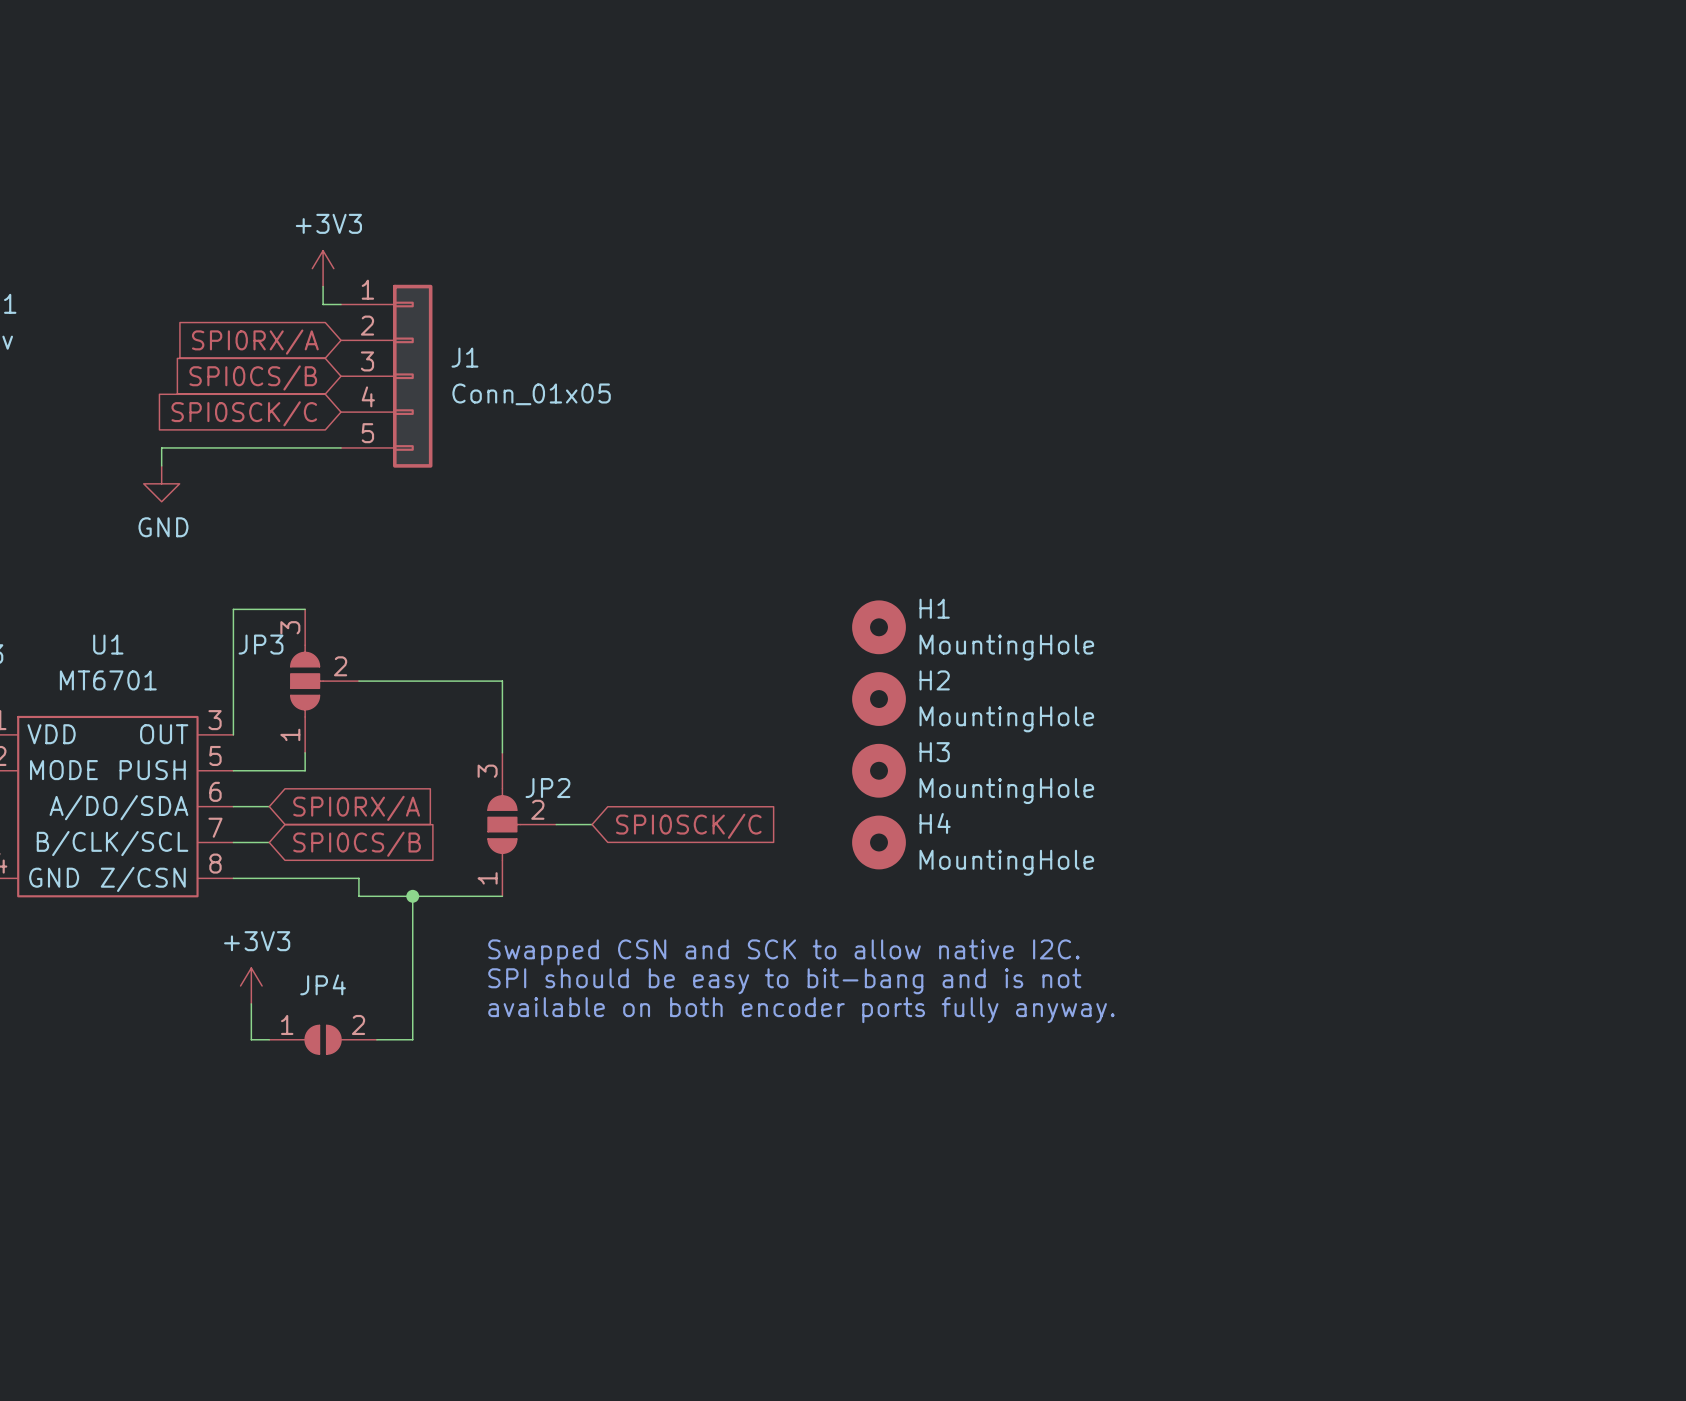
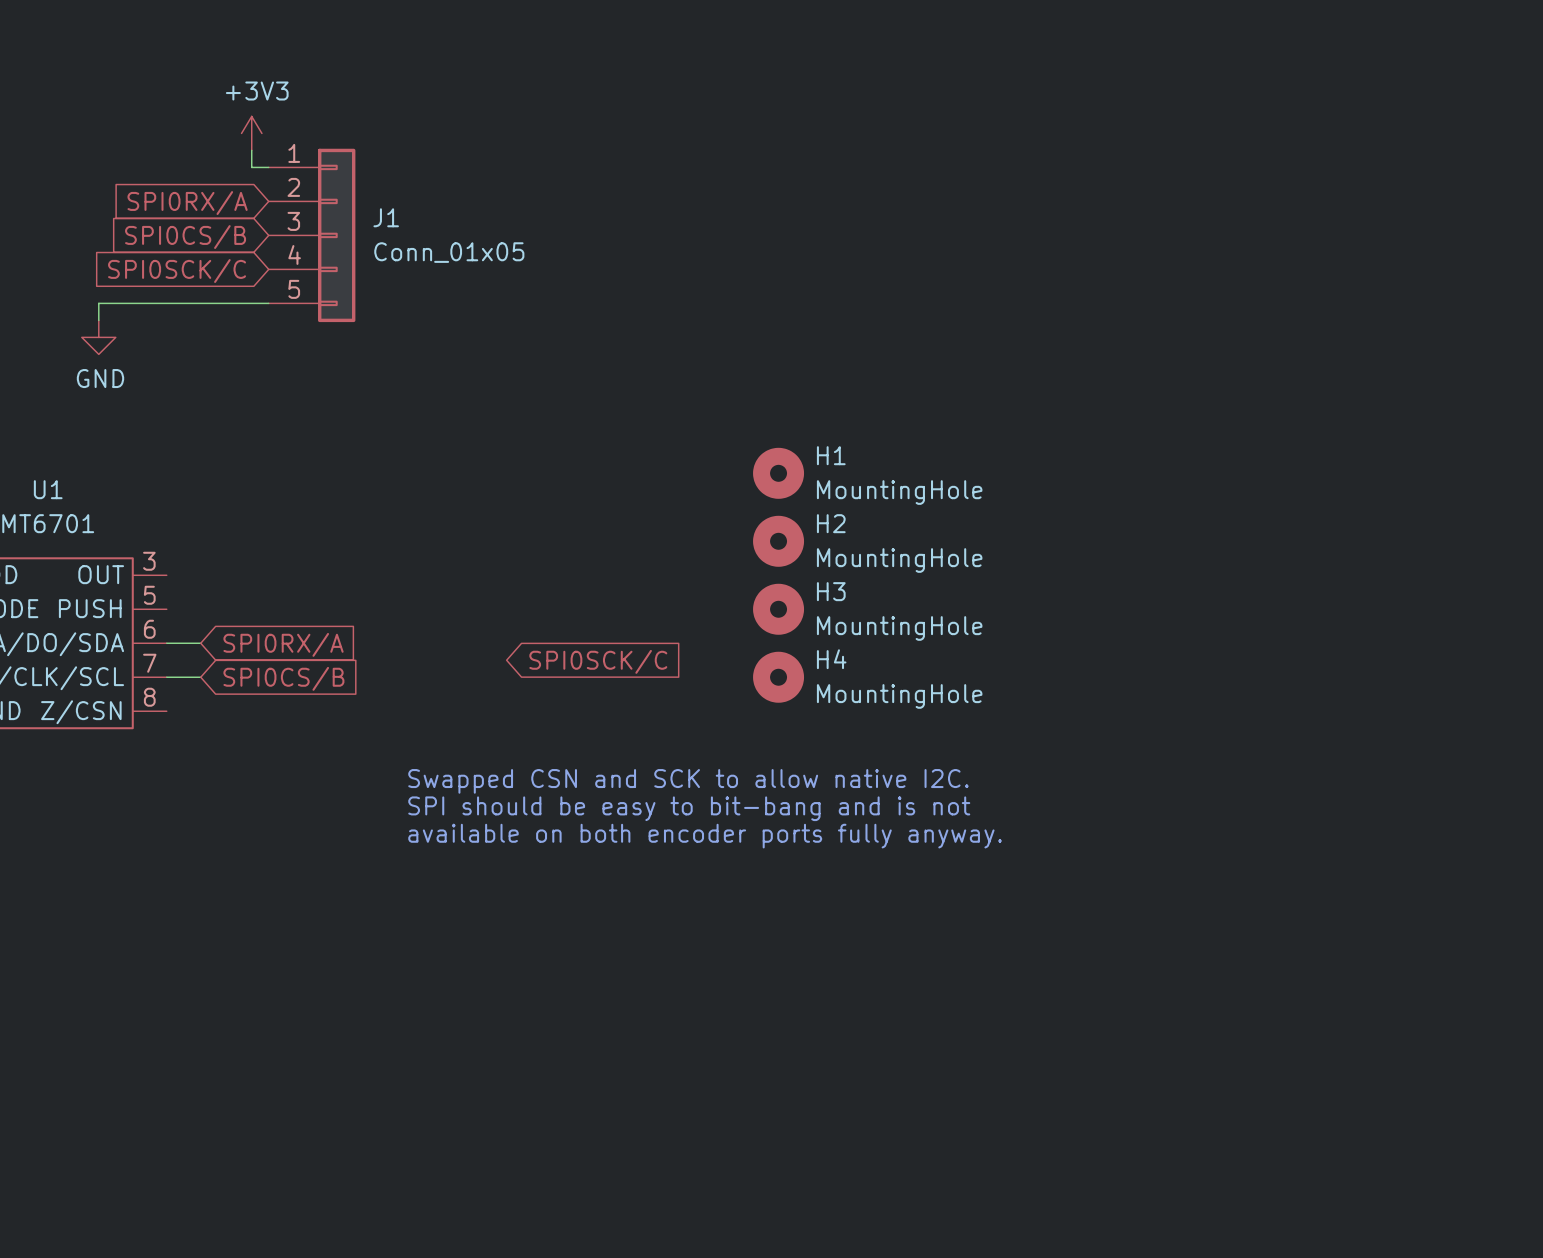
wire: (305, 609) (233, 609) (233, 734) -> none
JP3: (324, 681) -> none
wire: (358, 681) (502, 681) (502, 752) -> none
wire: (305, 752) (305, 770) (233, 770) -> none
JP2: (522, 824) -> none
wire: (556, 824) (592, 824) -> none
wire: (233, 878) (358, 878) (358, 896) (502, 896) -> none
wire: (412, 896) (412, 1039) (376, 1039) -> none
junction: (412, 896) -> none
power symbol: +3V3 (251, 985) -> none
wire: (251, 1003) (251, 1039) (269, 1039) -> none
JP4: (323, 1039) -> none

